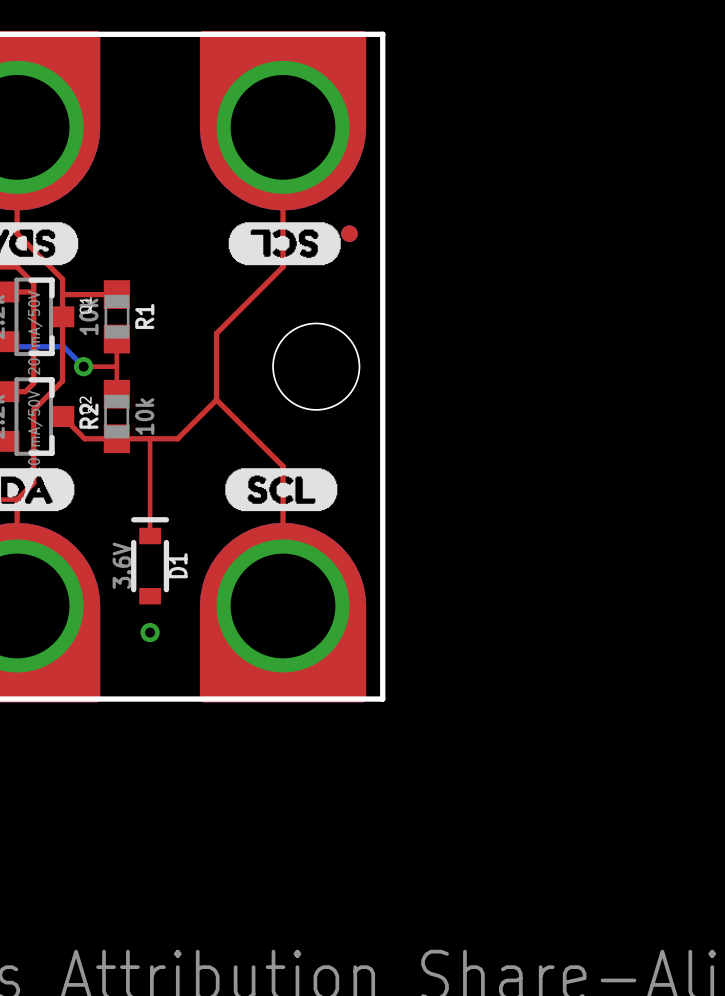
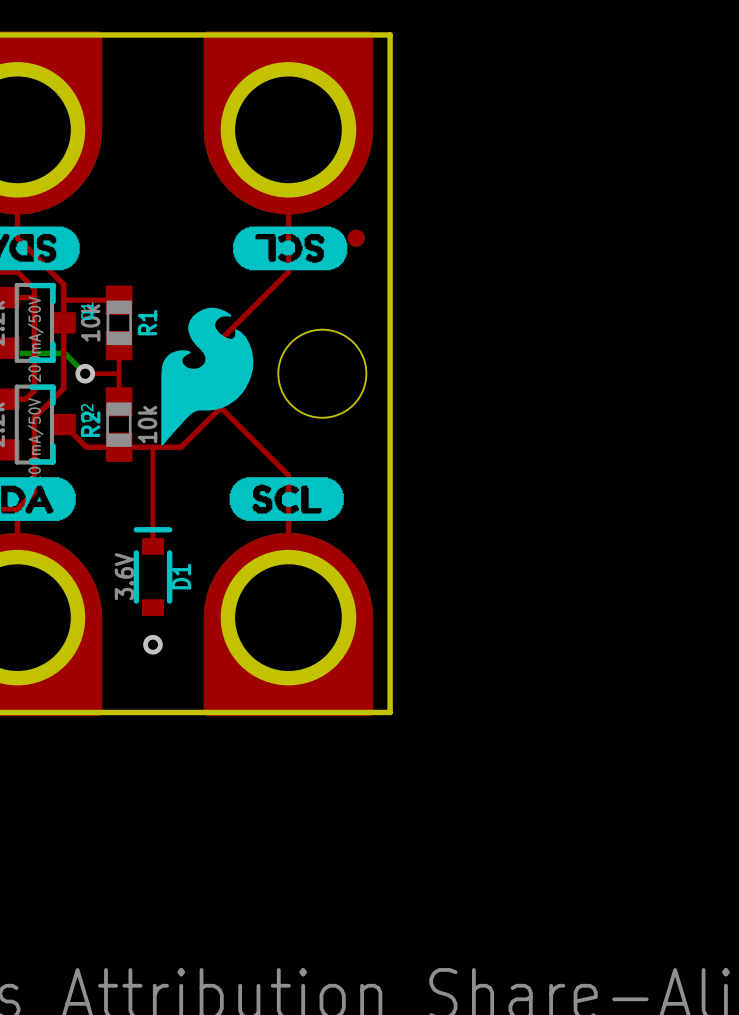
drawing: none -> [161, 307, 254, 446]

